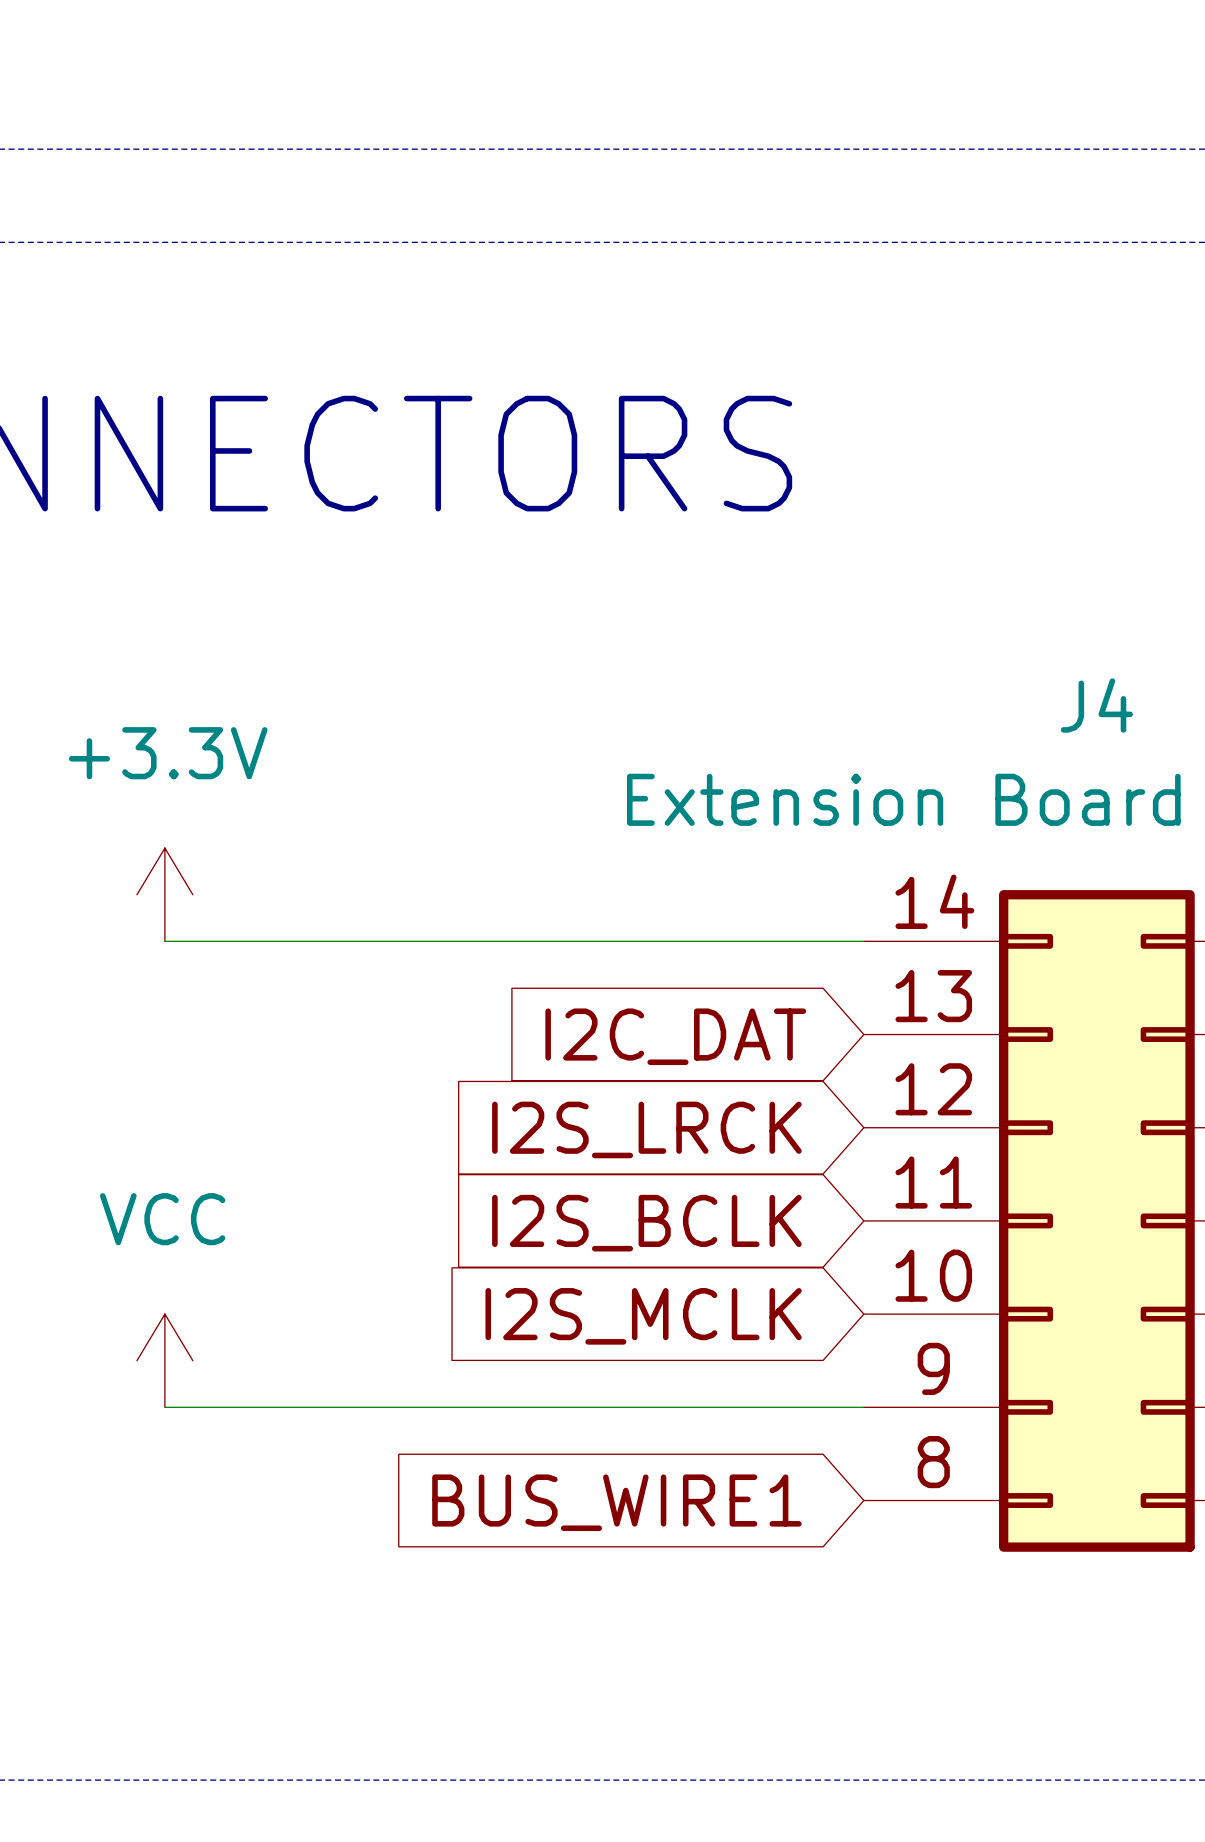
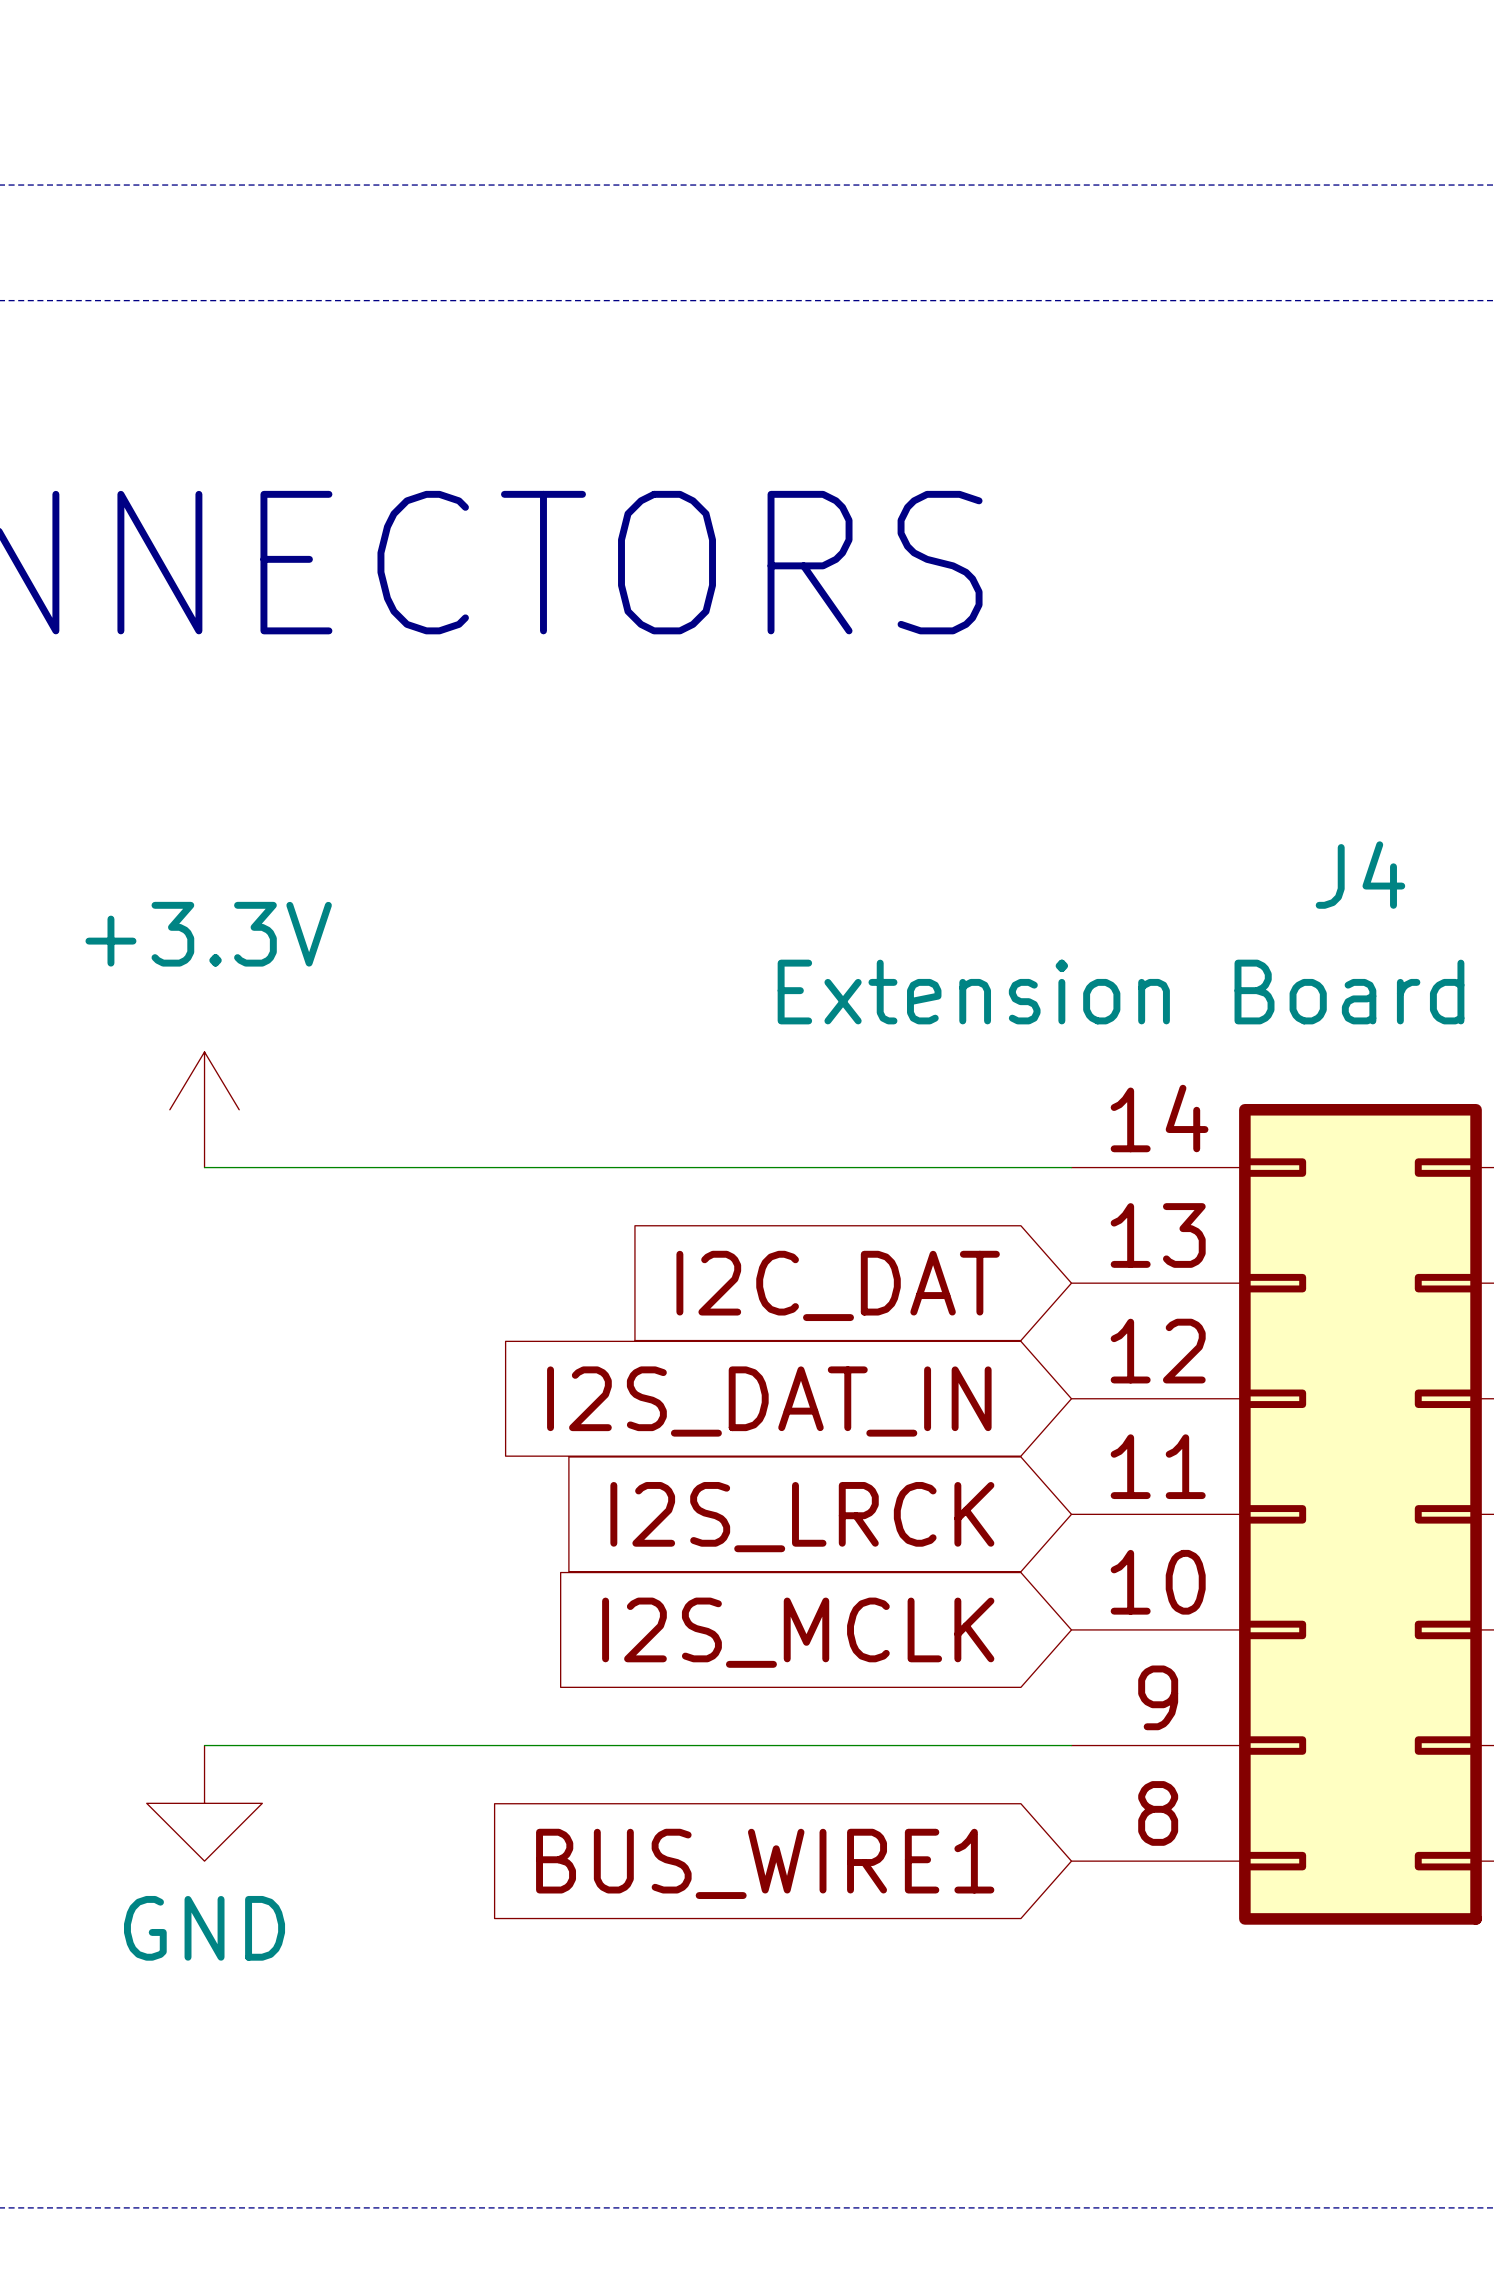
global label: I2S_LRCK (646, 1129) -> I2S_DAT_IN (769, 1401)
global label: I2S_BCLK (646, 1223) -> I2S_LRCK (802, 1517)
power symbol: VCC (164, 1360) -> none
power symbol: none -> GND (204, 1803)

